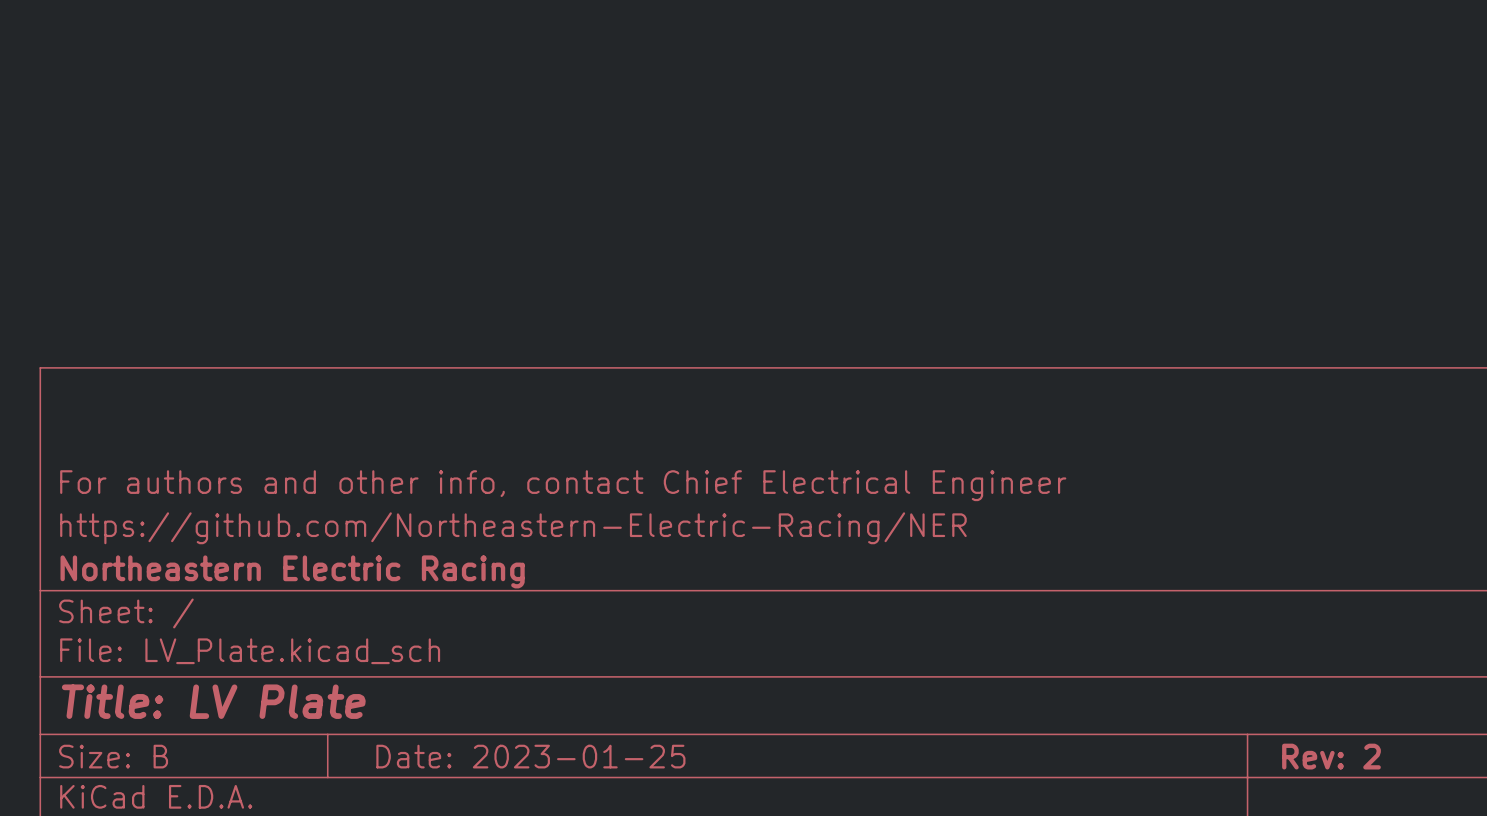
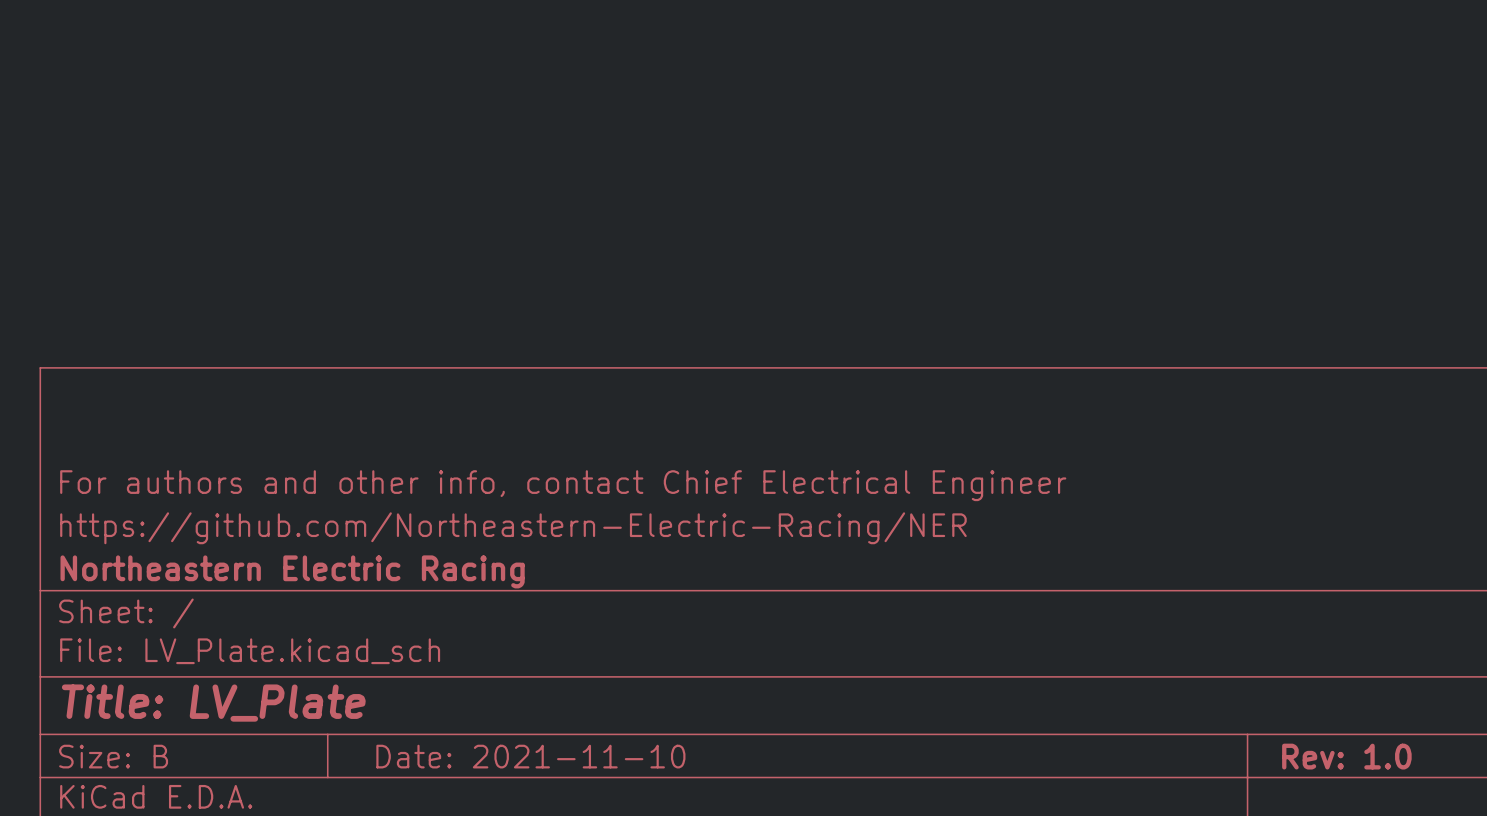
title block: Title: LV Plate (213, 701) -> Title: LV_Plate (213, 703)
title block: Date: 2023-01-25 (530, 756) -> Date: 2021-11-10 (530, 756)
title block: Rev: 2 (1331, 756) -> Rev: 1.0 (1346, 756)

